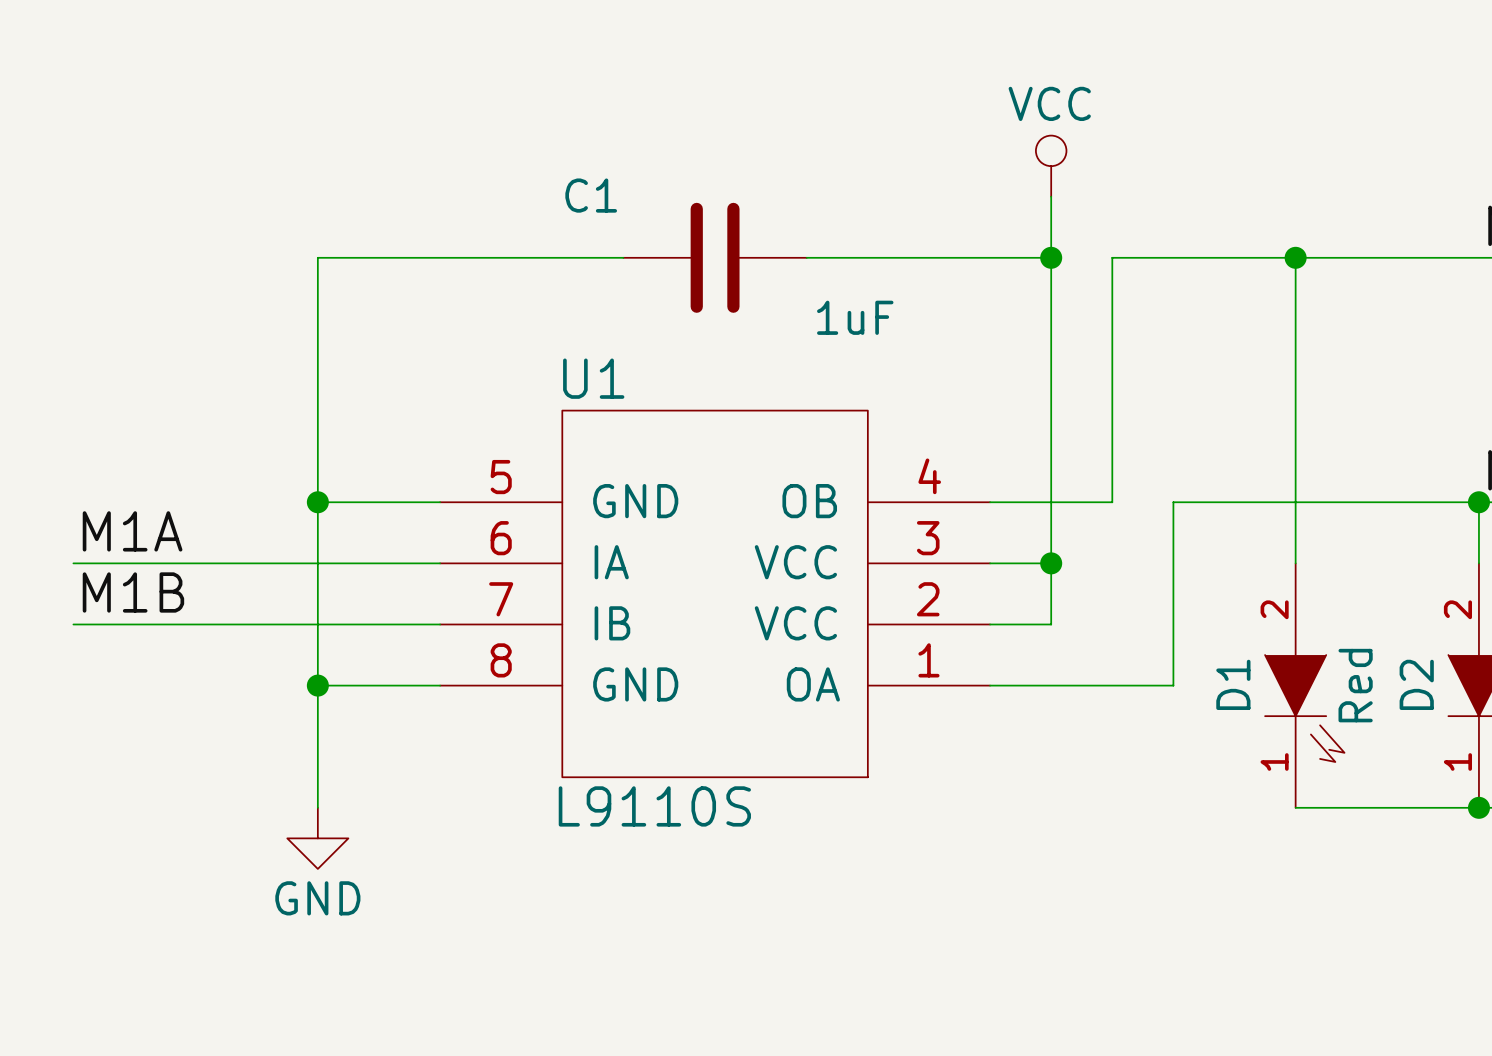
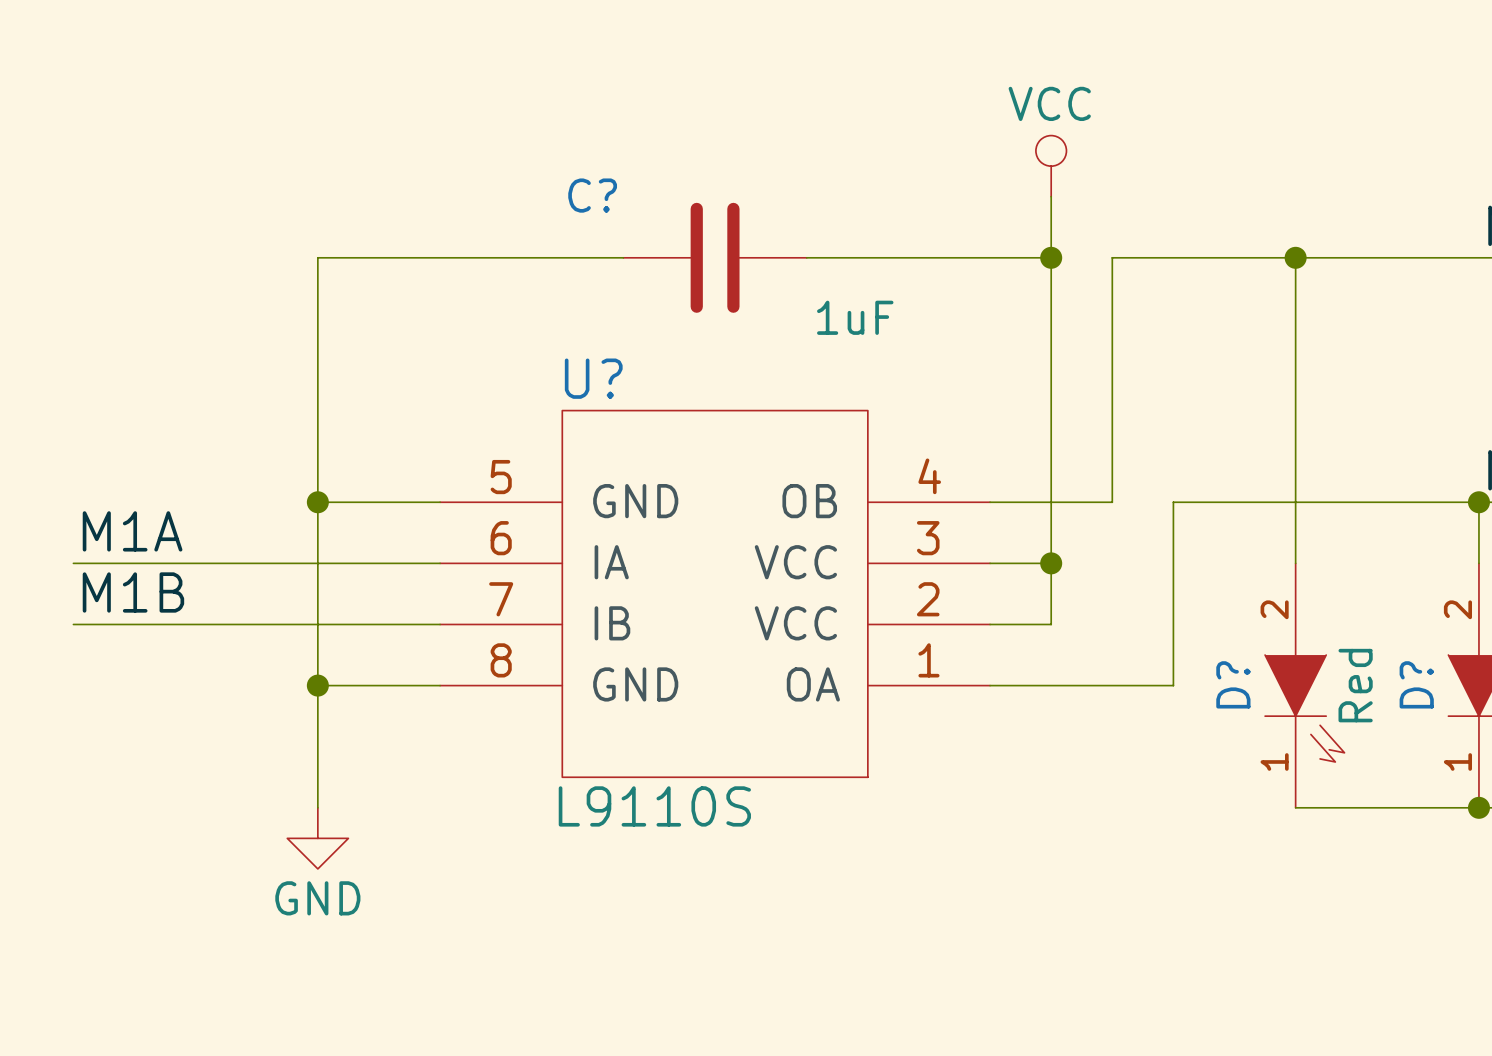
C1 name: C1 (591, 195) -> C? (592, 195)
U1 name: U1 (593, 378) -> U? (593, 378)
D1 name: D1 (1233, 684) -> D? (1233, 684)
D2 name: D2 (1416, 684) -> D? (1416, 684)

